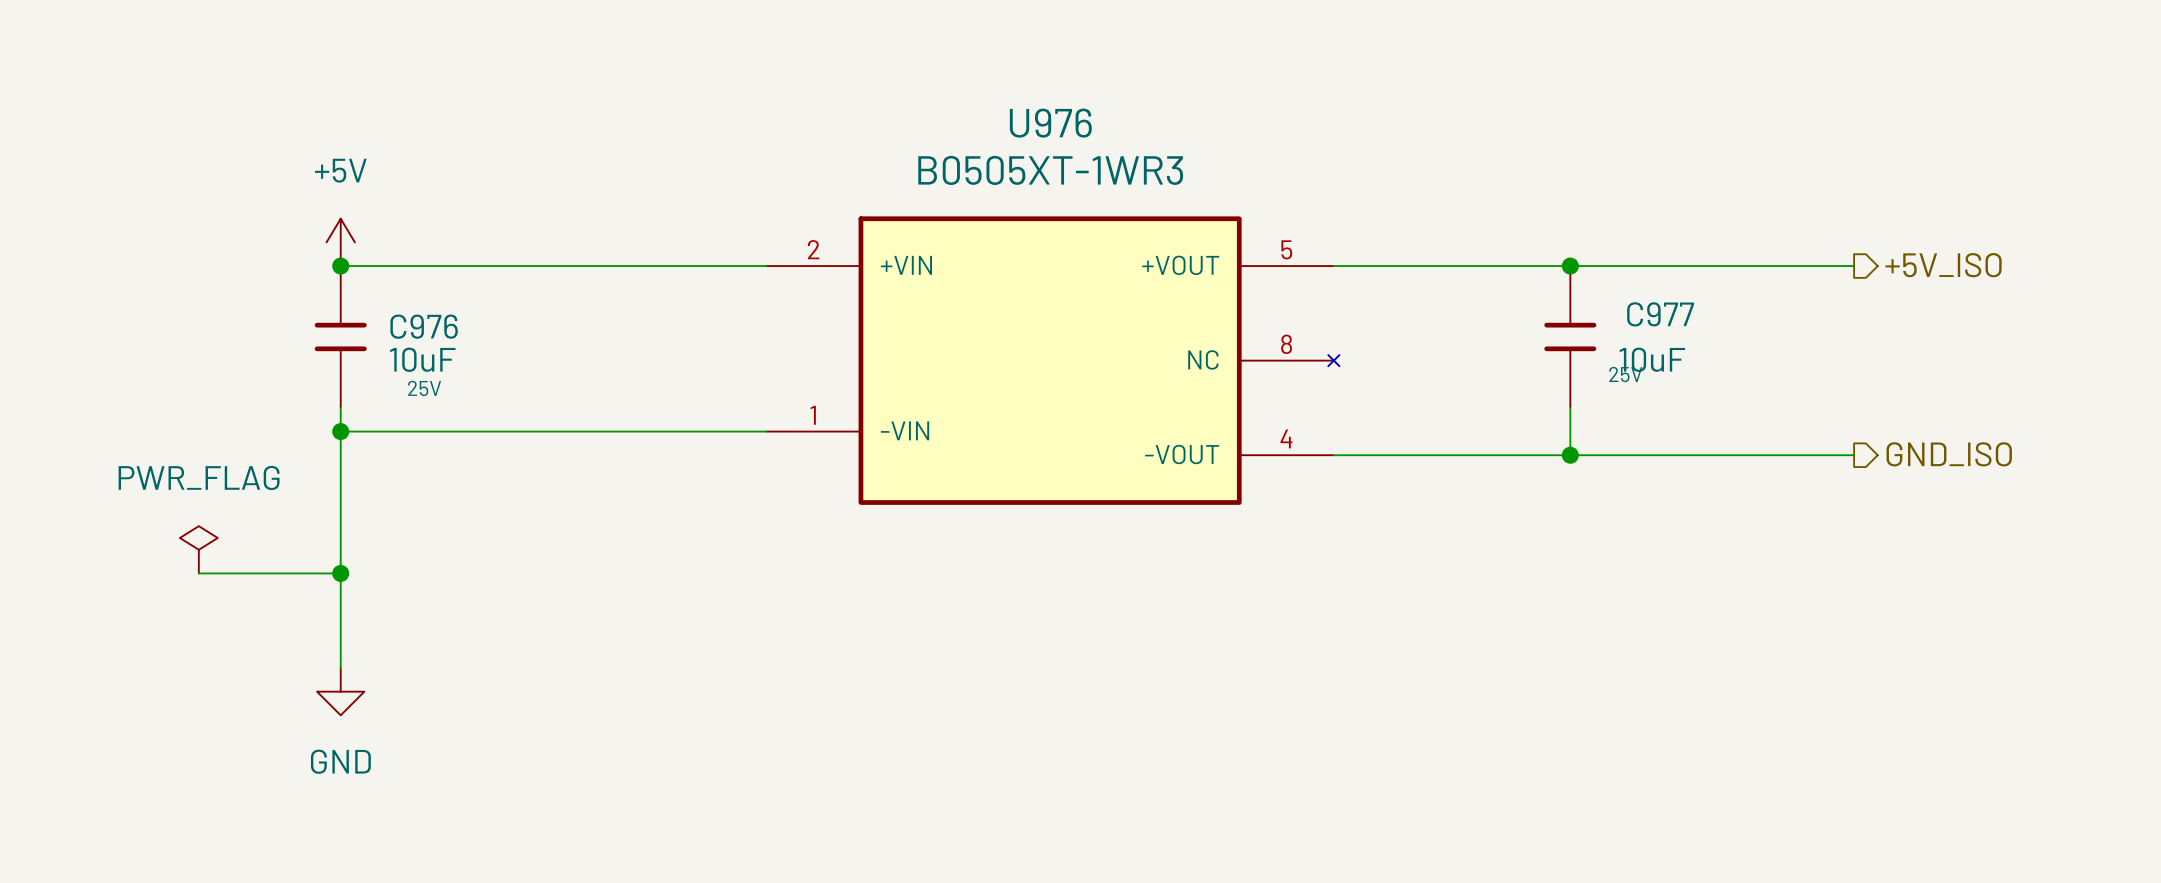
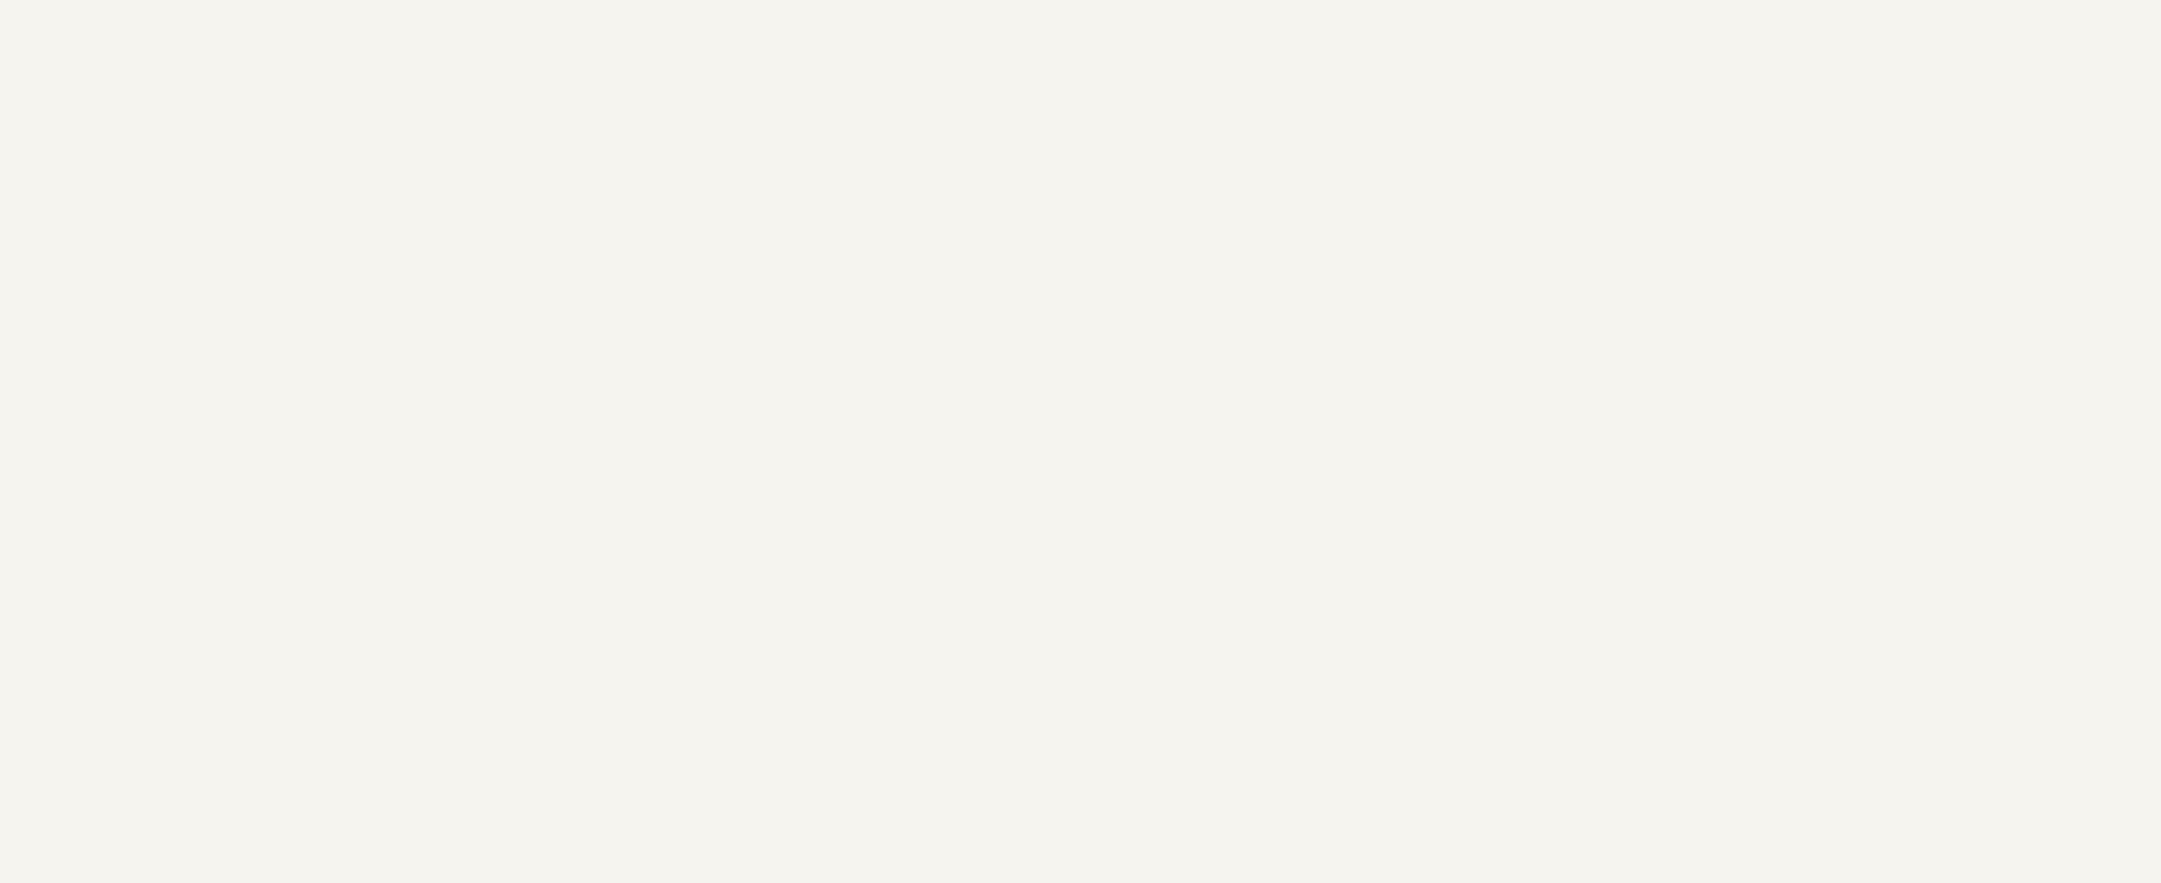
power symbol: +5V (340, 242) -> none
hierarchical label: +5V_ISO (1943, 265) -> none
wire: (340, 266) (766, 266) -> none
junction: (340, 266) -> none
wire: (1333, 266) (1854, 266) -> none
junction: (1570, 266) -> none
C976: 10uF (340, 336) -> none
C977: 10uF (1570, 336) -> none
U976: B0505XT-1WR3 (1052, 360) -> none
wire: (340, 407) (340, 668) -> none
wire: (1570, 407) (1570, 455) -> none
wire: (340, 431) (766, 431) -> none
junction: (340, 431) -> none
hierarchical label: GND_ISO (1949, 454) -> none
wire: (1333, 455) (1854, 455) -> none
junction: (1570, 455) -> none
power symbol: PWR_FLAG (198, 549) -> none
wire: (198, 573) (340, 573) -> none
junction: (340, 573) -> none
power symbol: GND (340, 691) -> none

